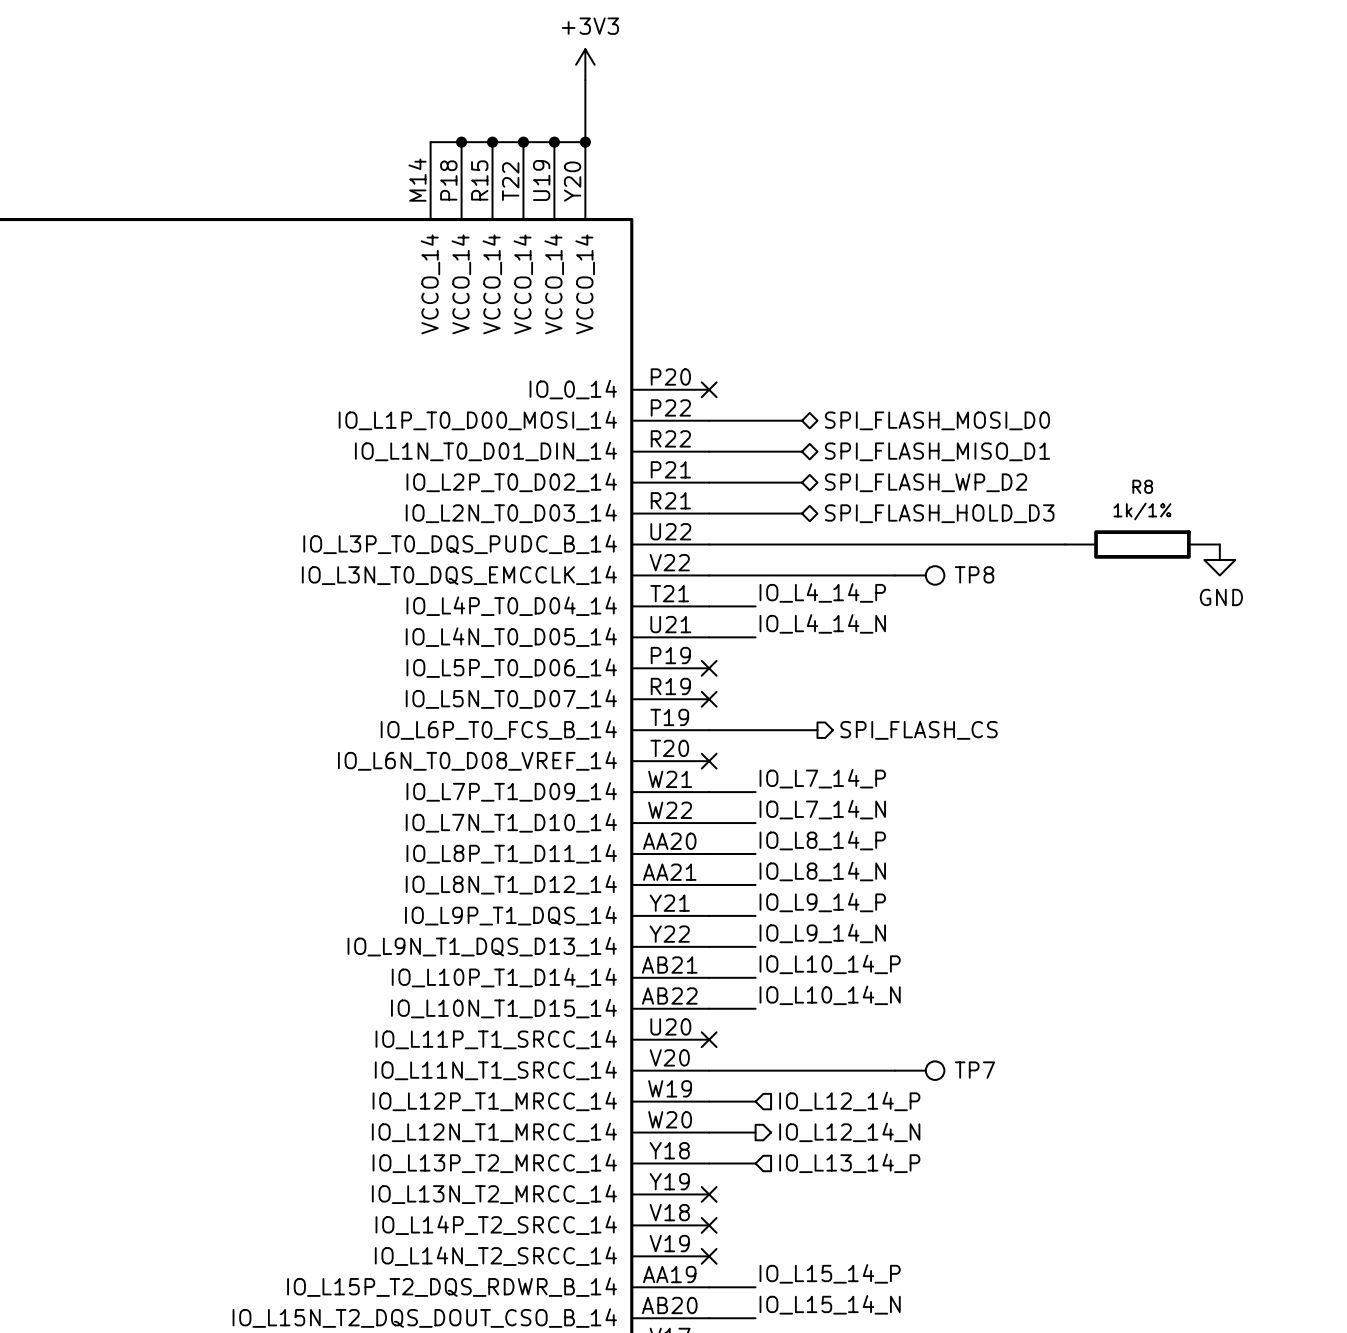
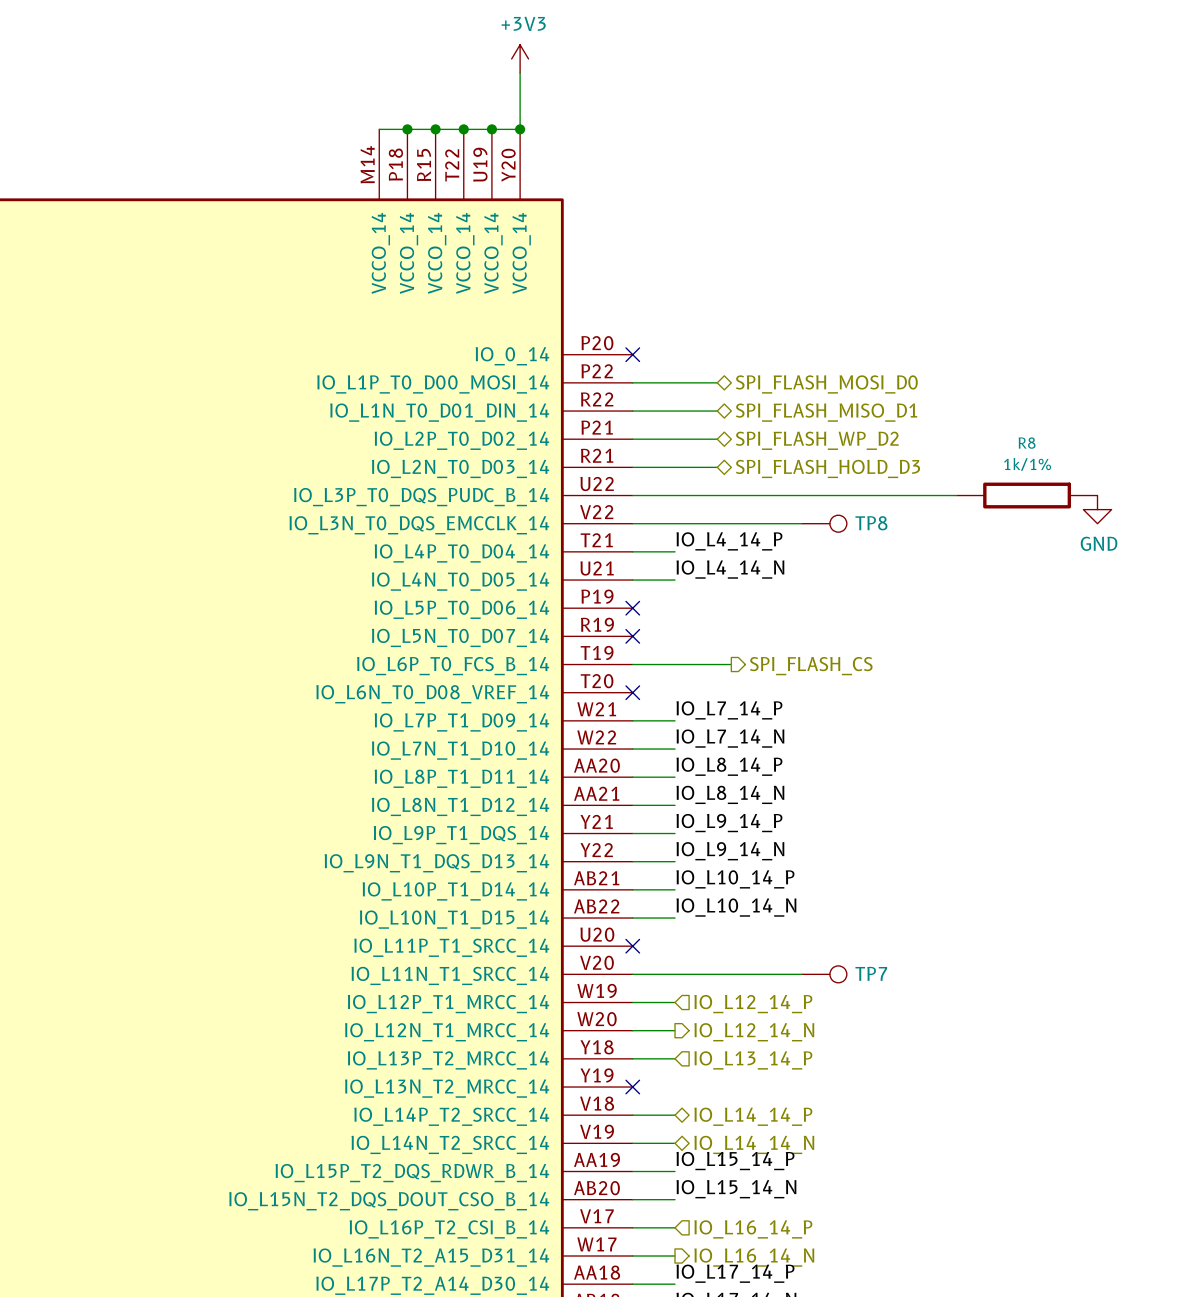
wire: none -> (632, 1115) (675, 1115)
no-connect mark: (709, 1225) -> none
hierarchical label: none -> IO_L14_14_P (753, 1116)
wire: none -> (632, 1143) (675, 1143)
no-connect mark: (709, 1256) -> none
hierarchical label: none -> IO_L14_14_N (754, 1144)

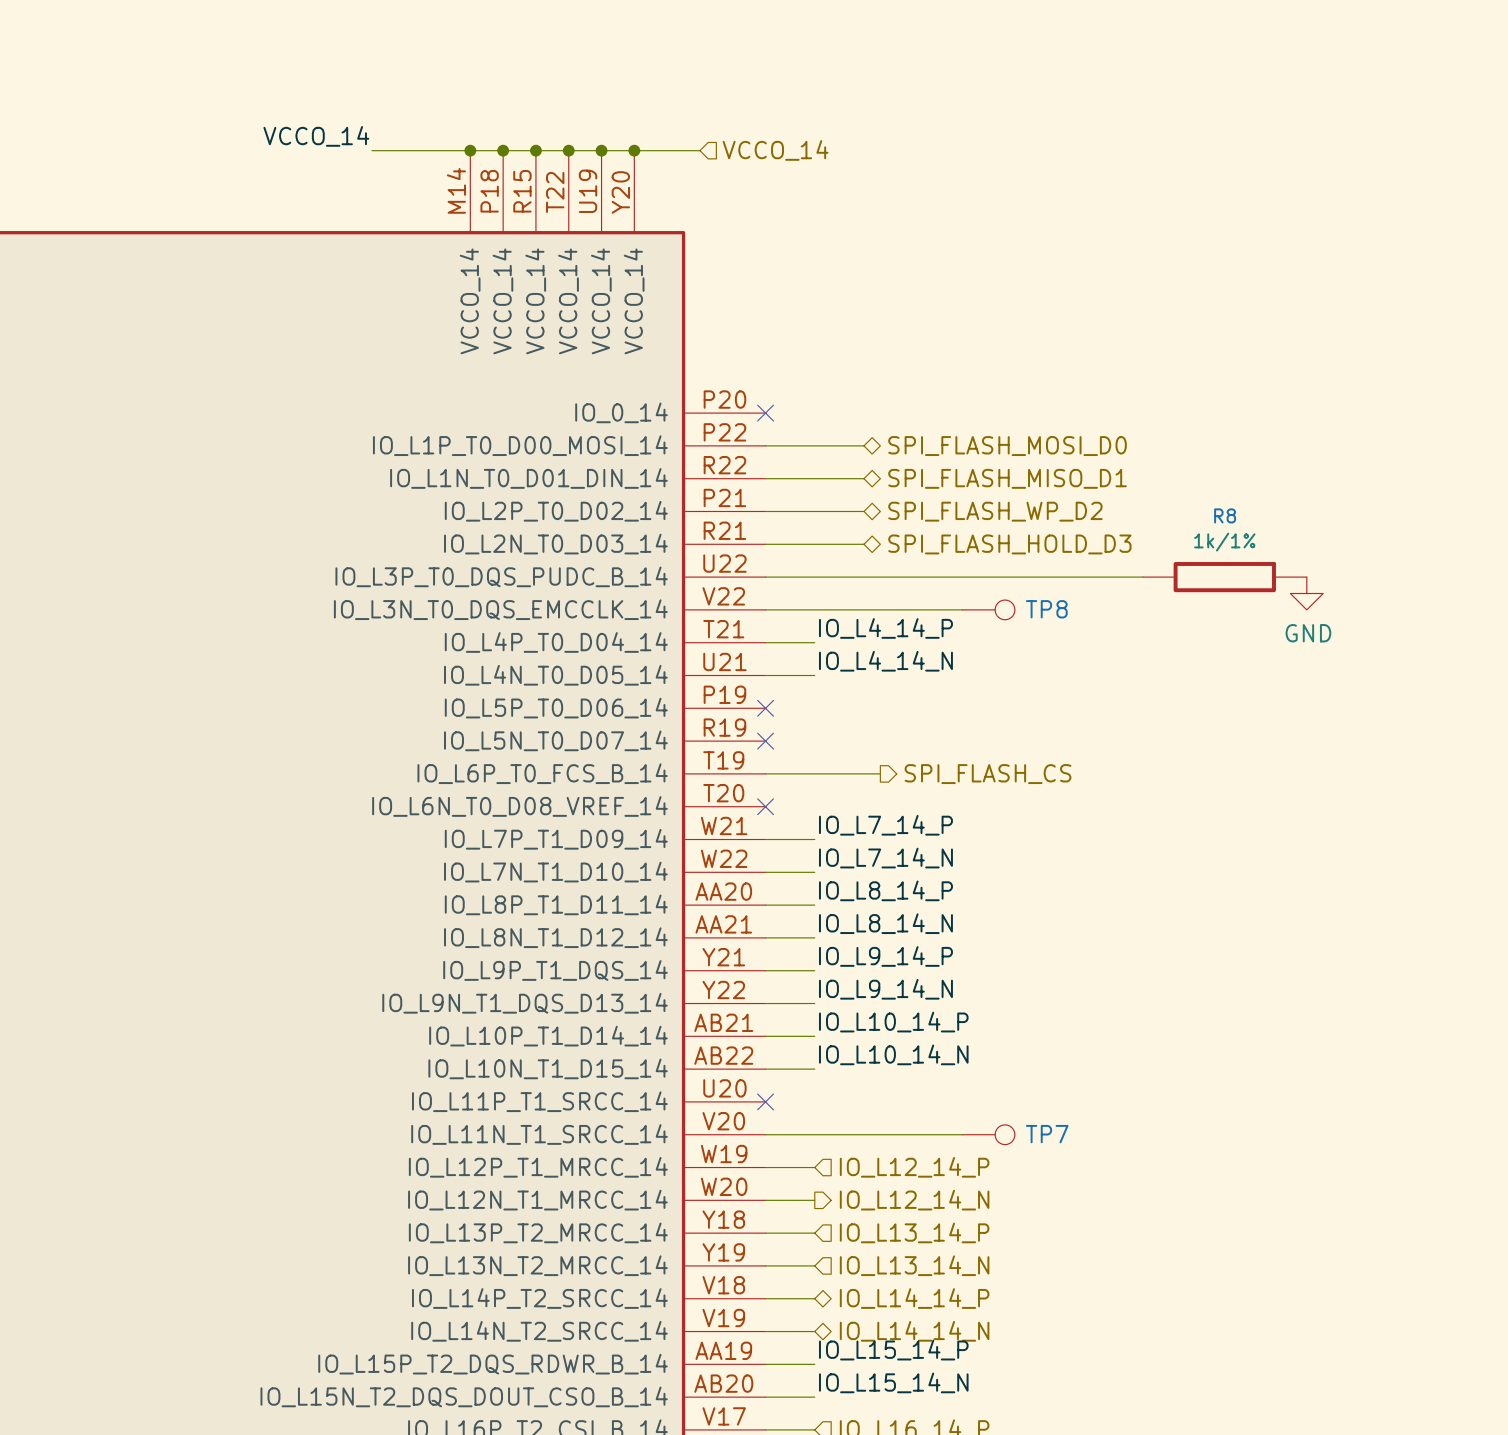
power symbol: +3V3 (520, 58) -> none
wire: (520, 73) (520, 129) -> (699, 150) (634, 150)
label: none -> VCCO_14 (316, 136)
wire: none -> (371, 150) (470, 150)
junction: none -> (470, 150)
hierarchical label: none -> VCCO_14 (775, 150)
wire: none -> (765, 1265) (814, 1265)
no-connect mark: (632, 1087) -> none
hierarchical label: none -> IO_L13_14_N (914, 1265)

